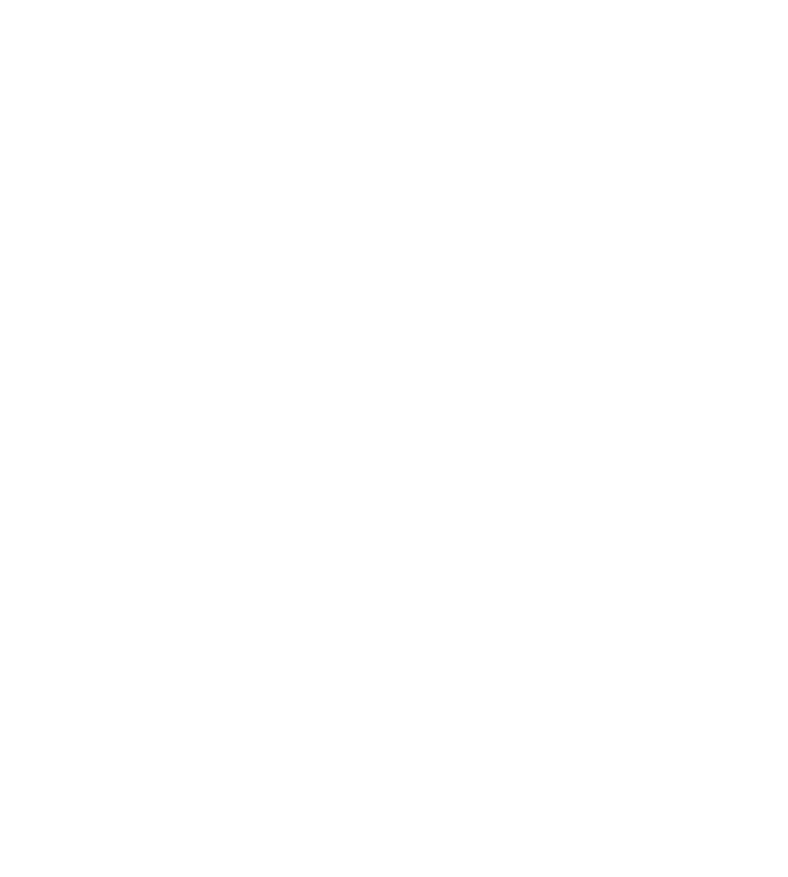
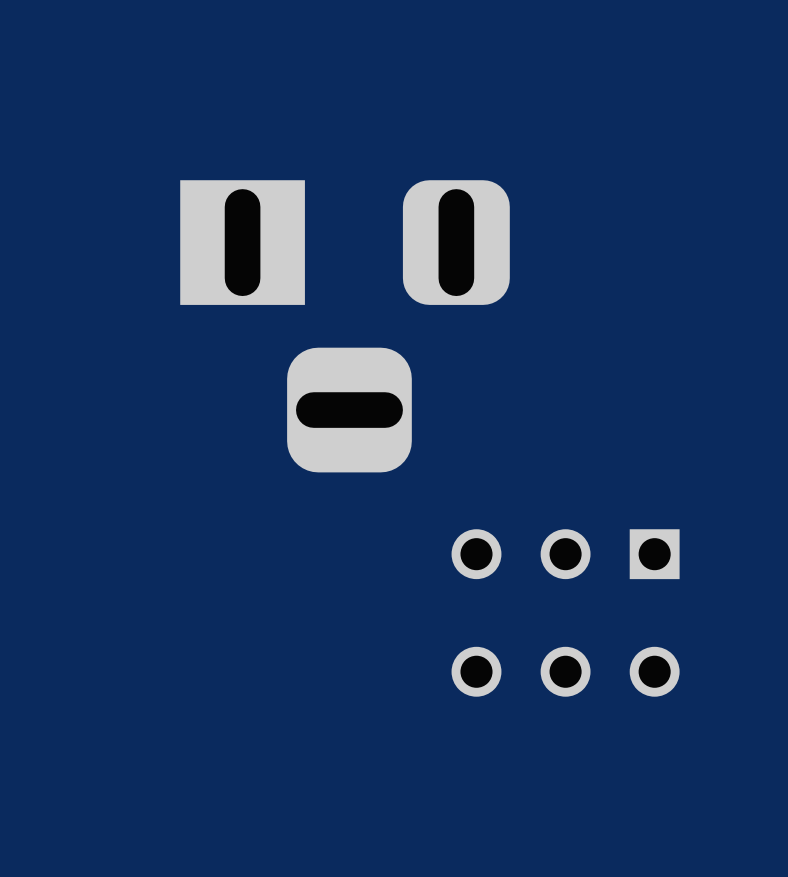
part: none -> (345, 326)
part: none -> (565, 612)

